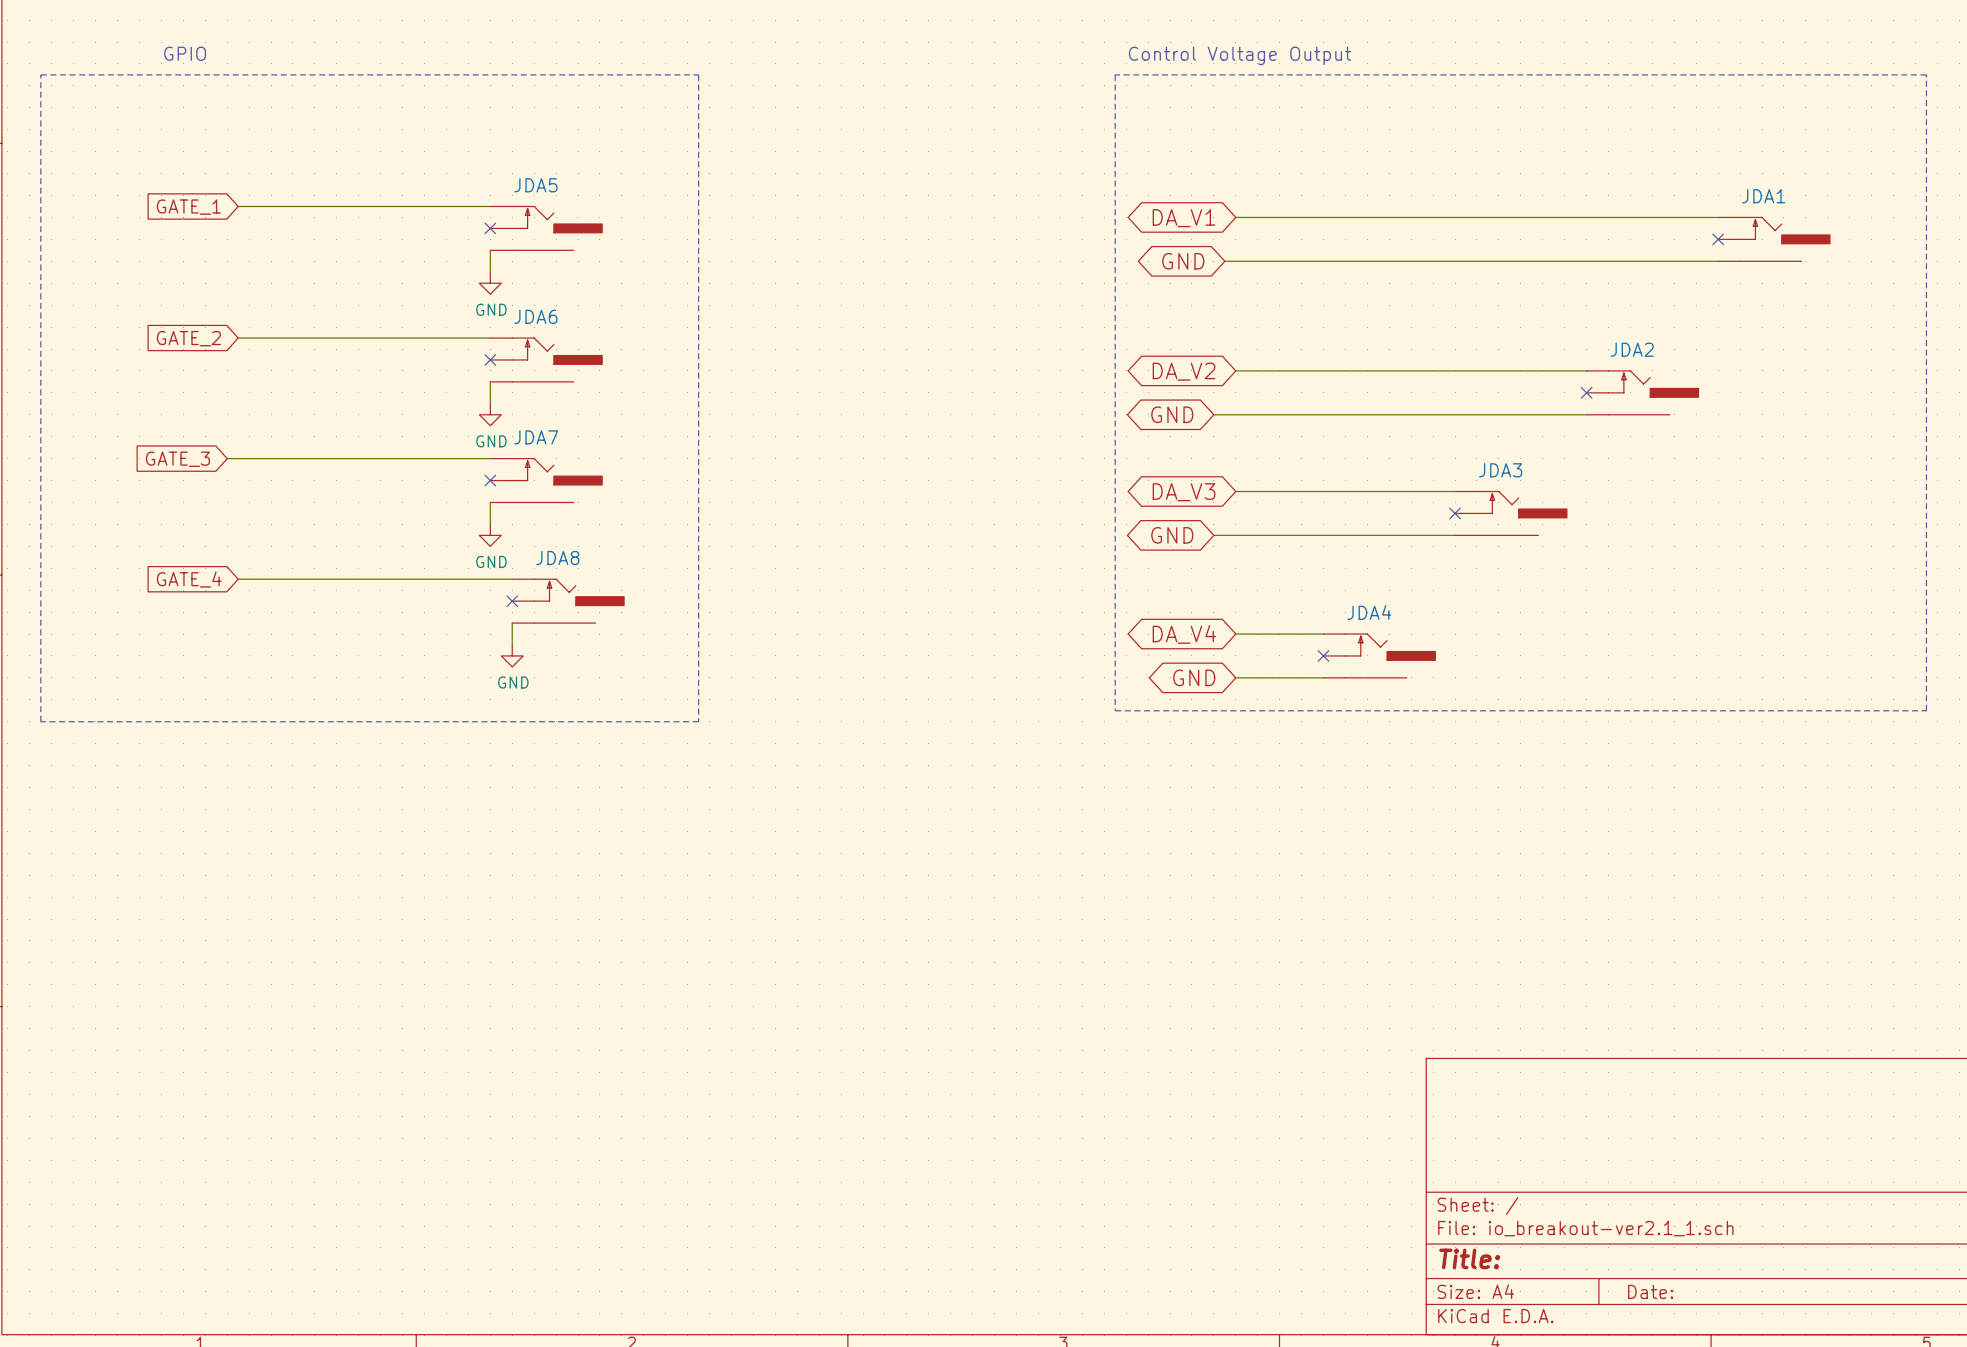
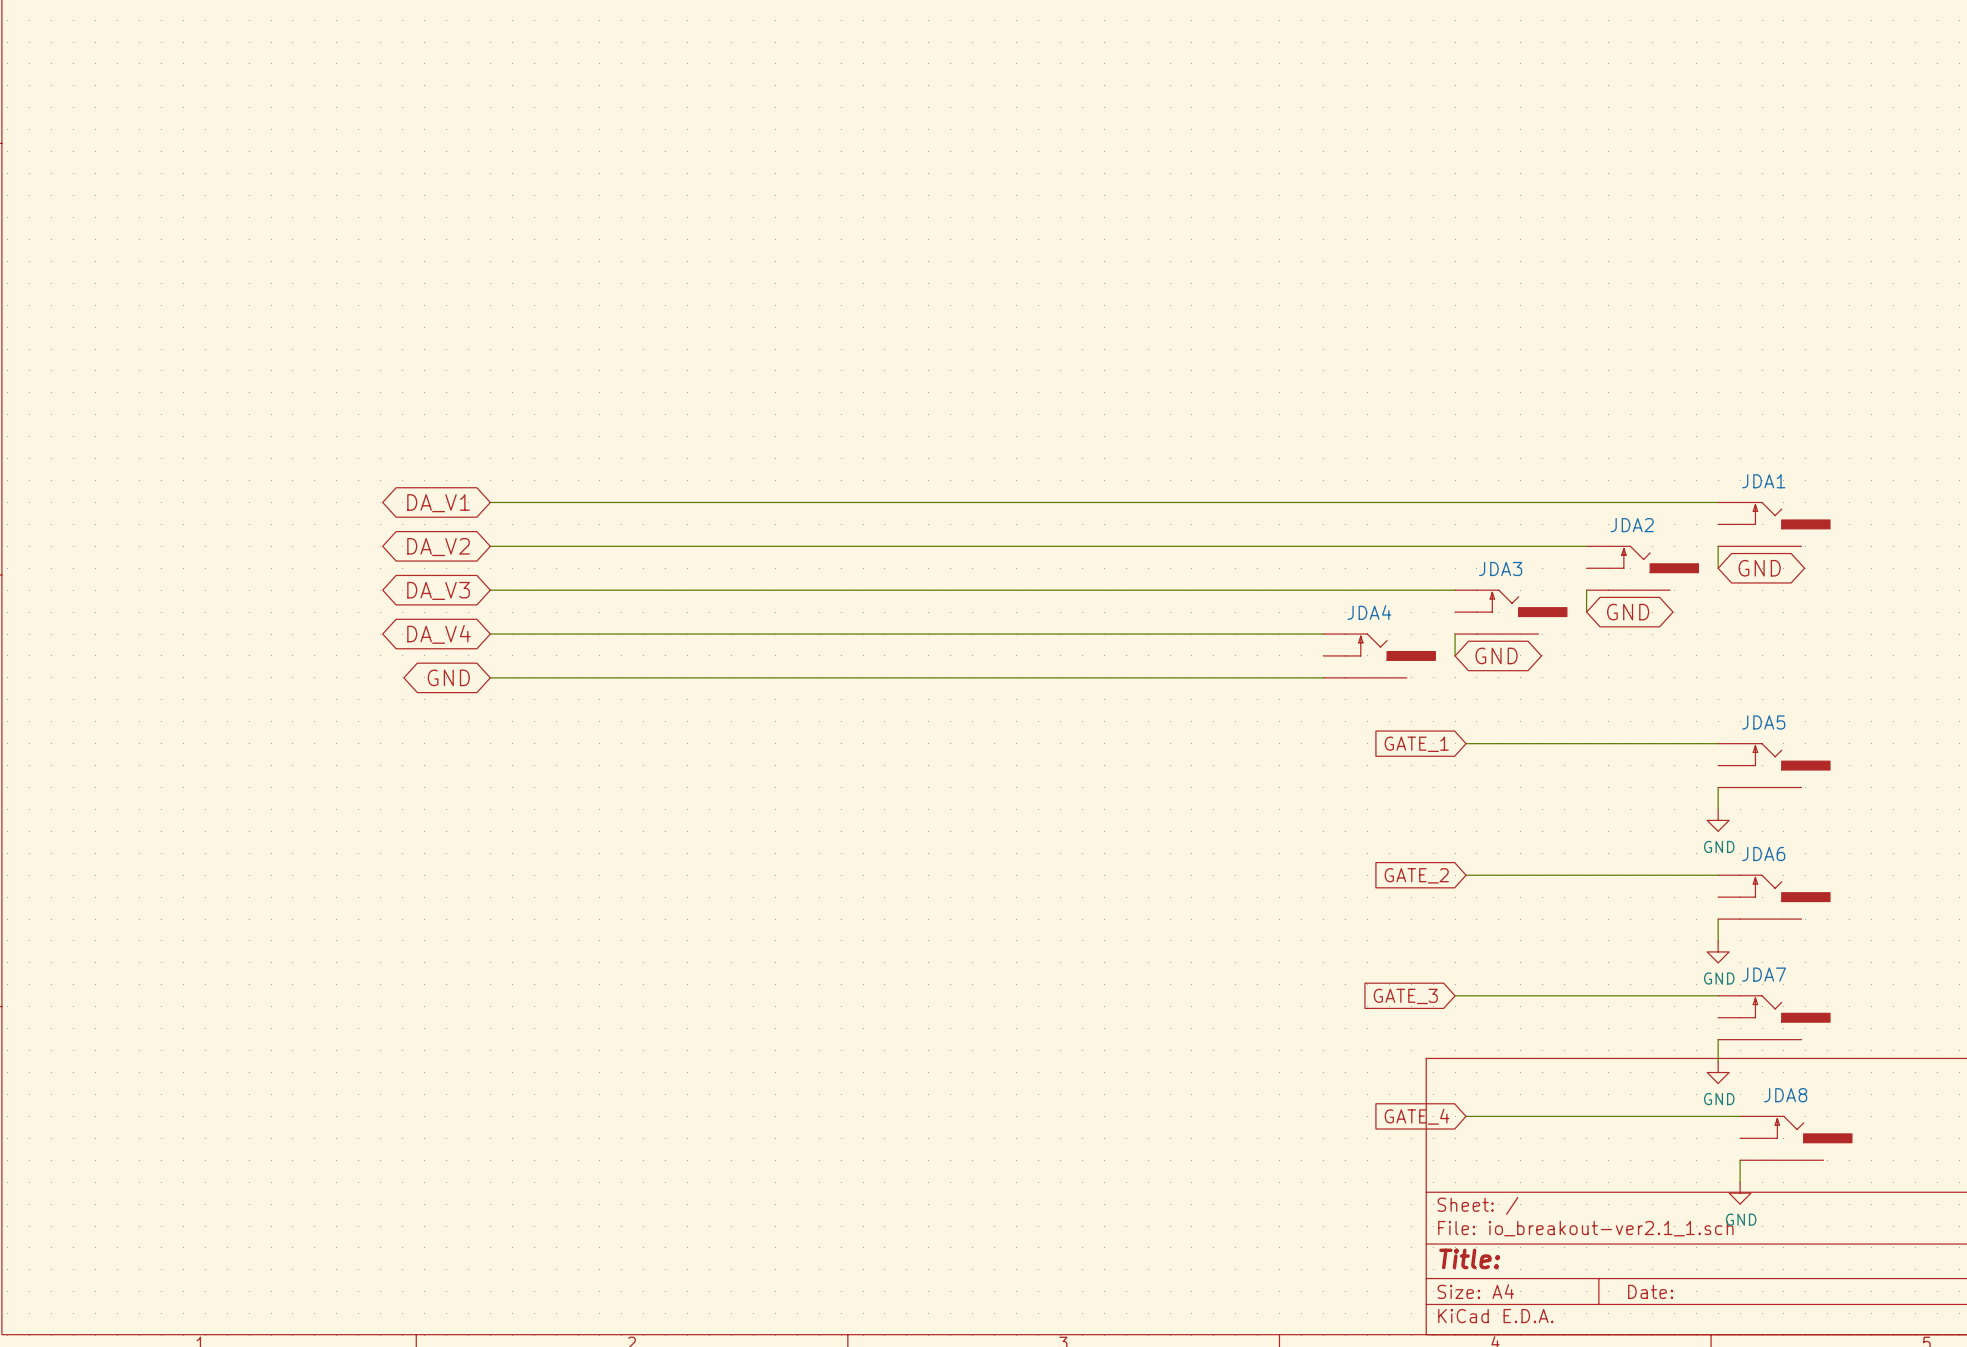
text: GPIO (185, 53) -> none
text: Control Voltage Output (1240, 55) -> none
line: (40, 74) (40, 721) (698, 721) (698, 74) (40, 74) -> none
line: (1115, 74) (1926, 74) (1926, 710) (1115, 710) (1115, 74) -> none
wire: (238, 206) (490, 206) -> none
global label: GATE_1 (188, 207) -> none
wire: (1235, 217) (1718, 217) -> none
global label: DA_V1 (1184, 218) -> none
no-connect mark: (490, 228) -> none
JDA5 position: (546, 228) -> (1774, 765)
no-connect mark: (1718, 239) -> none
JDA1 position: (1774, 239) -> (1774, 524)
wire: (490, 250) (490, 272) -> none
global label: GND (1183, 261) -> none
wire: (1224, 261) (1718, 261) -> none
power symbol: GND (490, 283) -> none
global label: GATE_2 (188, 338) -> none
wire: (238, 338) (490, 338) -> none
no-connect mark: (490, 359) -> none
JDA6 position: (546, 359) -> (1774, 897)
wire: (1235, 370) (1586, 370) -> none
global label: DA_V2 (1184, 371) -> none
wire: (490, 381) (490, 403) -> none
no-connect mark: (1586, 392) -> none
JDA2 position: (1642, 392) -> (1642, 568)
power symbol: GND (490, 414) -> none
global label: GND (1172, 414) -> none
wire: (1213, 414) (1586, 414) -> none
wire: (227, 458) (490, 458) -> none
global label: GATE_3 (177, 459) -> none
no-connect mark: (490, 480) -> none
JDA7 position: (546, 480) -> (1774, 1017)
wire: (1235, 491) (1455, 491) -> none
global label: DA_V3 (1184, 492) -> none
wire: (490, 502) (490, 524) -> (490, 502) (1718, 502)
global label: none -> DA_V1 (438, 503)
no-connect mark: (1455, 513) -> none
JDA3 position: (1510, 513) -> (1510, 612)
power symbol: GND (490, 535) -> none
global label: GND (1172, 535) -> none
wire: (1213, 535) (1455, 535) -> none
wire: none -> (490, 546) (1586, 546)
wire: none -> (1718, 546) (1718, 568)
global label: none -> DA_V2 (438, 547)
global label: none -> GND (1759, 568)
global label: GATE_4 (189, 579) -> none
wire: (238, 579) (512, 579) -> none
global label: none -> DA_V3 (438, 590)
wire: none -> (490, 590) (1455, 590)
wire: none -> (1586, 590) (1586, 612)
no-connect mark: (512, 601) -> none
JDA8 position: (568, 601) -> (1795, 1138)
global label: none -> GND (1628, 612)
wire: (512, 623) (512, 644) -> none
global label: none -> DA_V4 (438, 634)
wire: none -> (490, 634) (1235, 634)
global label: DA_V4 (1184, 634) -> none
wire: none -> (1455, 634) (1455, 655)
power symbol: GND (512, 655) -> none
no-connect mark: (1323, 655) -> none
global label: none -> GND (1496, 655)
global label: none -> GND (448, 677)
wire: none -> (490, 677) (1235, 677)
global label: GND (1194, 677) -> none
wire: none -> (1466, 743) (1718, 743)
global label: none -> GATE_1 (1416, 744)
wire: none -> (1718, 787) (1718, 809)
power symbol: none -> GND (1718, 820)
global label: none -> GATE_2 (1416, 875)
wire: none -> (1466, 875) (1718, 875)
wire: none -> (1718, 919) (1718, 940)
power symbol: none -> GND (1718, 951)
wire: none -> (1455, 995) (1718, 995)
global label: none -> GATE_3 (1405, 996)
wire: none -> (1718, 1039) (1718, 1061)
power symbol: none -> GND (1718, 1072)
global label: none -> GATE_4 (1417, 1116)
wire: none -> (1466, 1116) (1740, 1116)
wire: none -> (1740, 1160) (1740, 1182)
power symbol: none -> GND (1740, 1193)

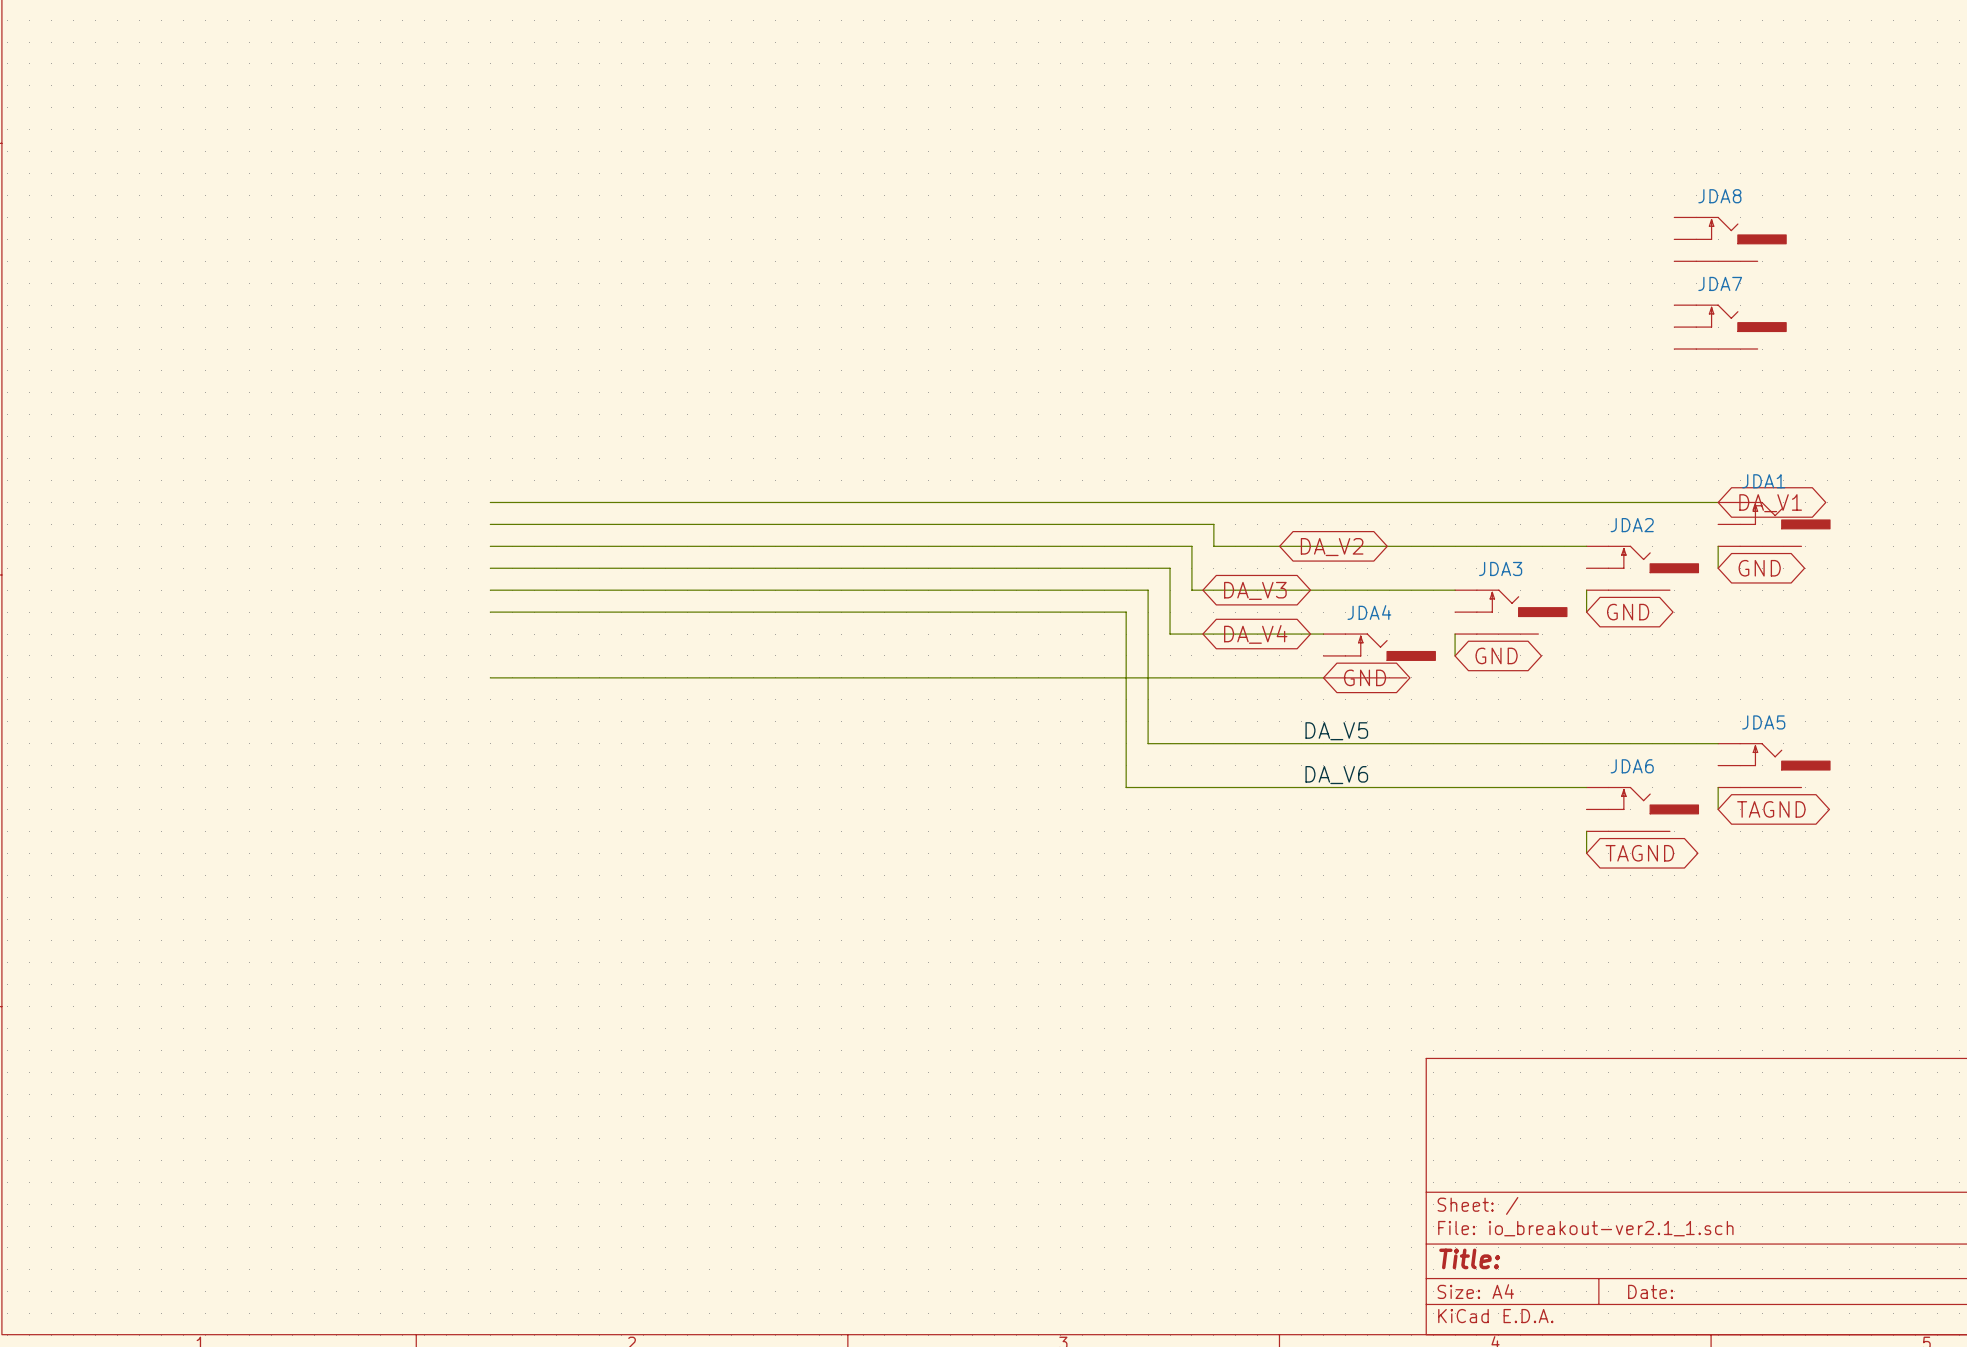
global label: DA_V1 (438, 503) -> none
global label: none -> DA_V1 (1770, 503)
wire: none -> (490, 524) (1213, 524) (1213, 546)
wire: (1191, 546) (1213, 546) -> (1191, 546) (1191, 590)
global label: DA_V2 (438, 547) -> none
global label: none -> DA_V2 (1332, 547)
global label: DA_V3 (438, 590) -> none
wire: (1148, 590) (1191, 590) -> (1148, 590) (1148, 743) (1466, 743)
global label: none -> DA_V3 (1255, 590)
wire: none -> (490, 612) (1126, 612) (1126, 787) (1586, 787)
global label: DA_V4 (438, 634) -> none
wire: (490, 634) (1170, 634) -> (490, 568) (1170, 568) (1170, 634)
global label: none -> DA_V4 (1255, 634)
global label: GND (448, 677) -> none
global label: none -> GND (1365, 677)
label: none -> DA_V5 (1336, 731)
global label: GATE_1 (1416, 744) -> none
label: none -> DA_V6 (1336, 775)
global label: none -> TAGND (1771, 809)
power symbol: GND (1718, 820) -> none
global label: none -> TAGND (1639, 853)
global label: GATE_2 (1416, 875) -> none
wire: (1466, 875) (1718, 875) -> none
JDA6 position: (1774, 897) -> (1642, 809)
wire: (1718, 919) (1718, 940) -> (1586, 831) (1586, 853)
power symbol: GND (1718, 951) -> none
wire: (1455, 995) (1718, 995) -> none
global label: GATE_3 (1405, 996) -> none
JDA7 position: (1774, 1017) -> (1730, 327)
wire: (1718, 1039) (1718, 1061) -> none
power symbol: GND (1718, 1072) -> none
global label: GATE_4 (1417, 1116) -> none
wire: (1466, 1116) (1740, 1116) -> none
JDA8 position: (1795, 1138) -> (1730, 239)
wire: (1740, 1160) (1740, 1182) -> none
power symbol: GND (1740, 1193) -> none

